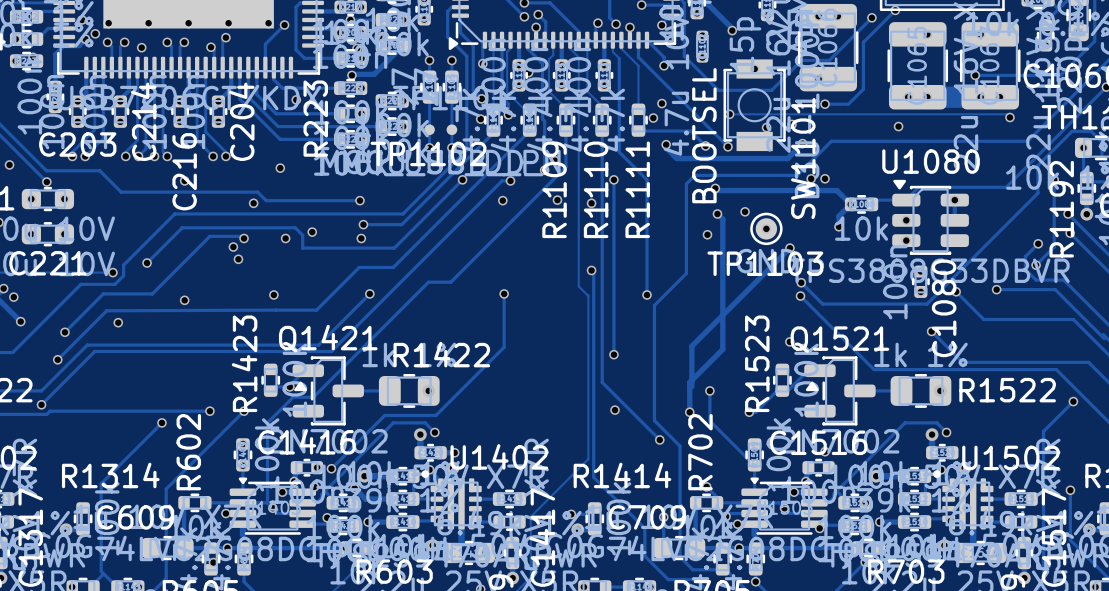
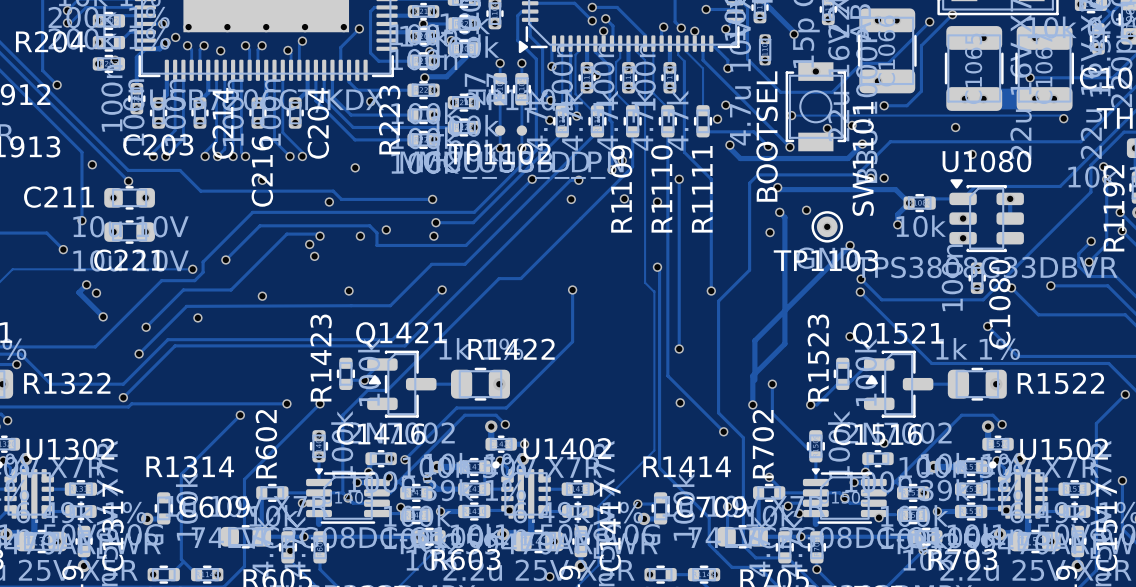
via: none -> (972, 154)
via: none -> (1103, 166)

